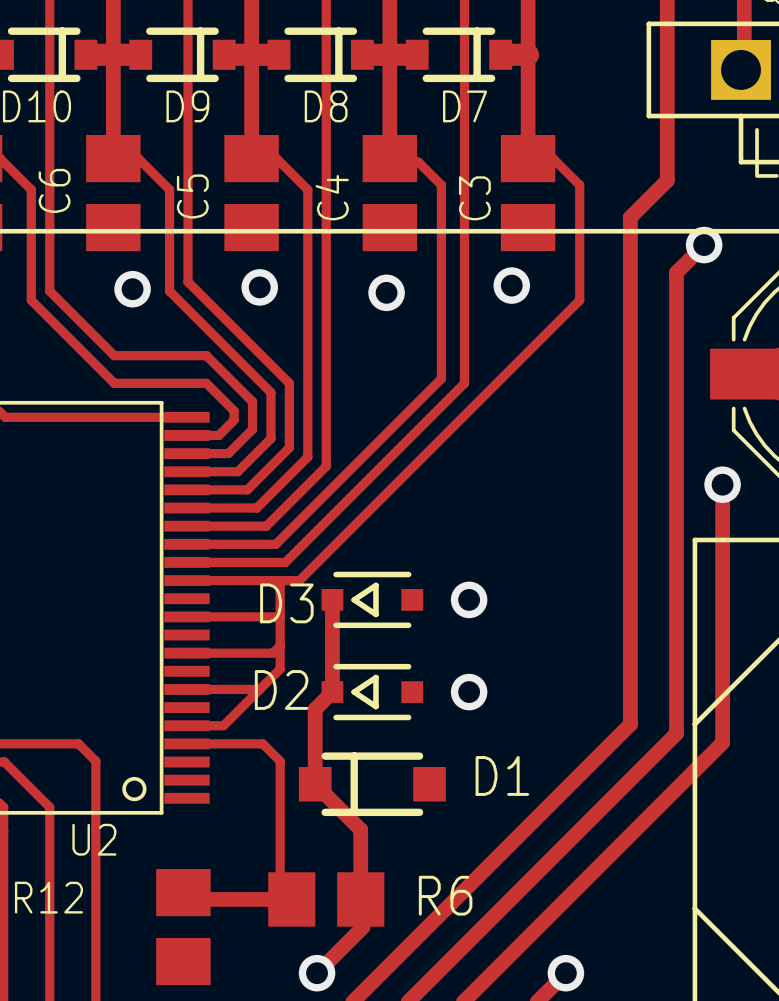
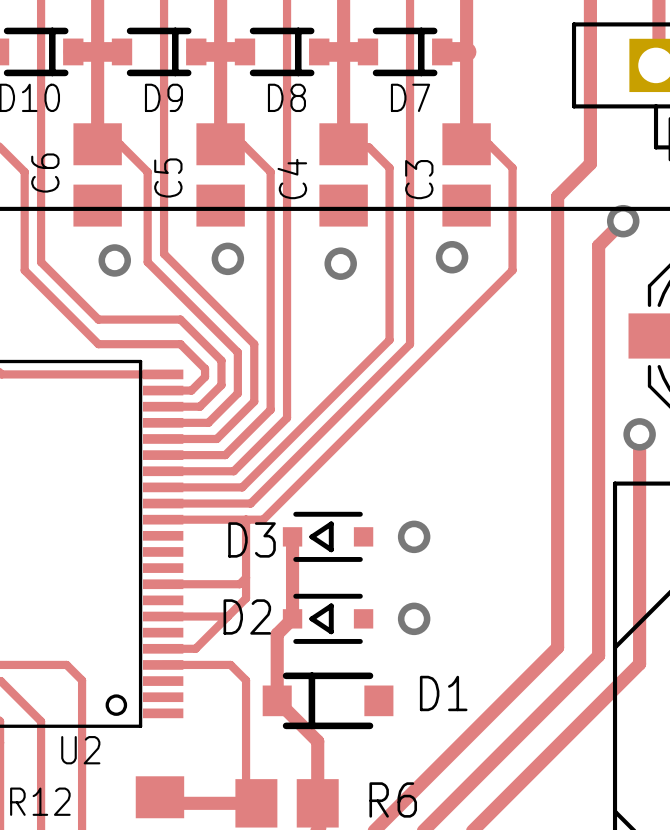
track: (187, 616) (280, 616) -> none

